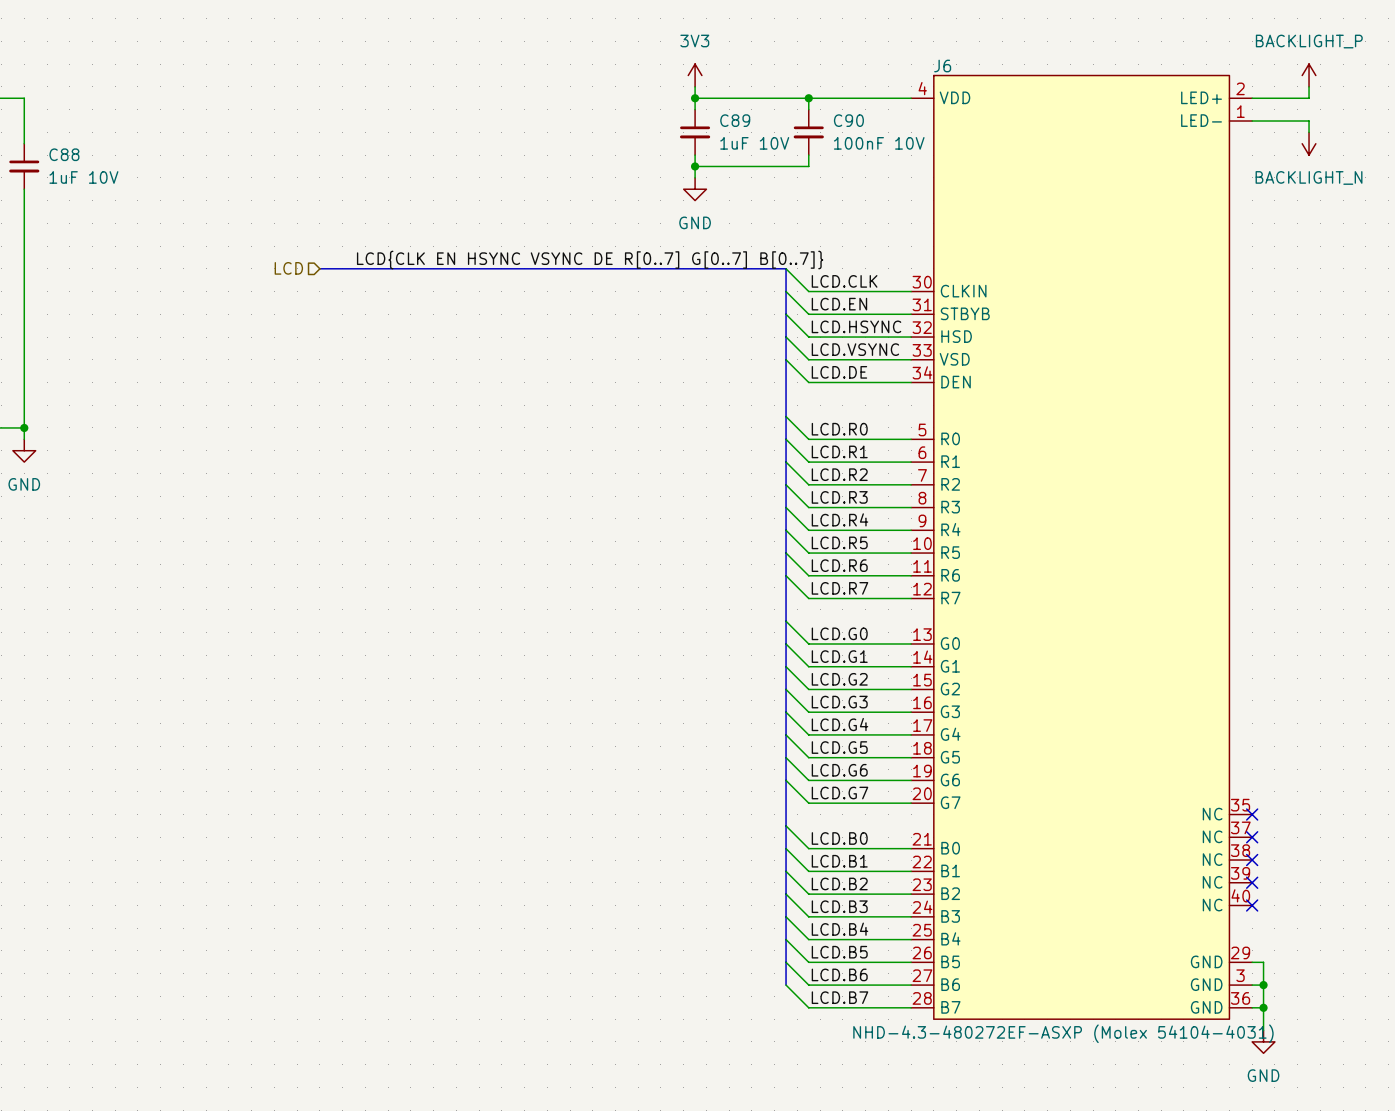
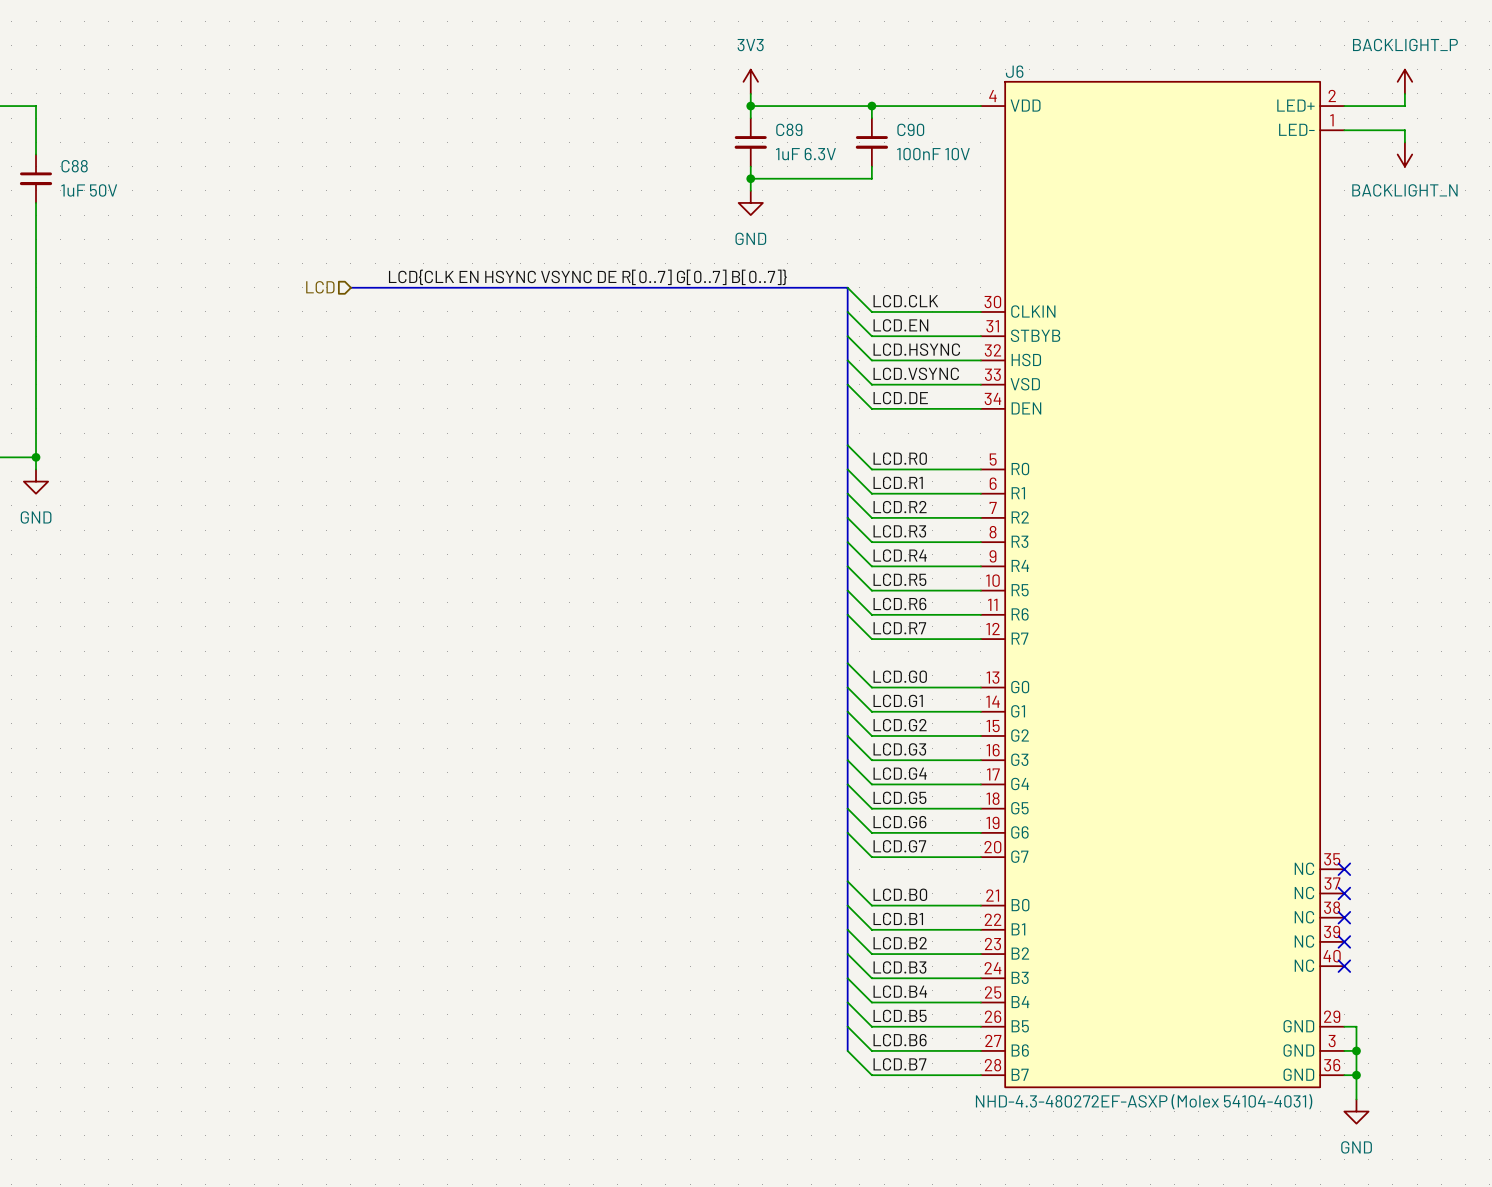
C89 value: 1uF 10V (754, 143) -> 1uF 6.3V (805, 154)
C88 value: 1uF 10V (83, 177) -> 1uF 50V (89, 190)

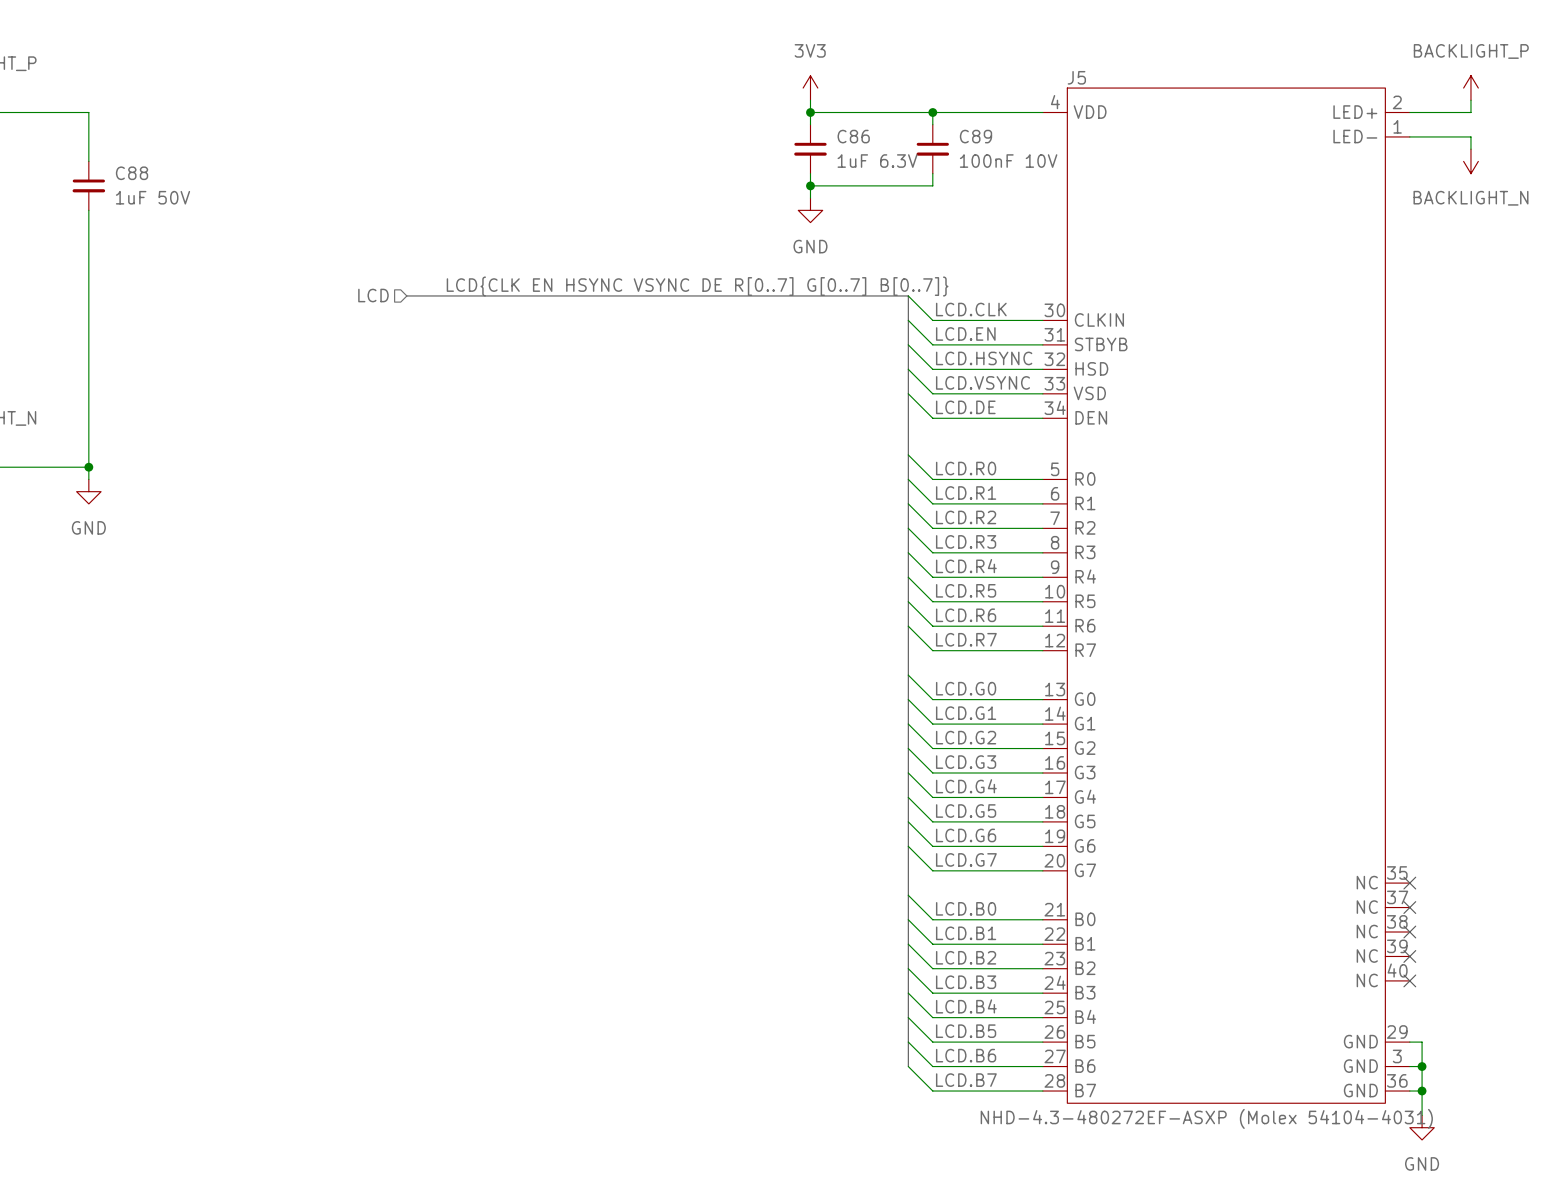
J6 name: J6 (1014, 71) -> J5 (1076, 77)
C89 name: C89 (789, 129) -> C86 (853, 136)
C90 name: C90 (910, 129) -> C89 (975, 136)

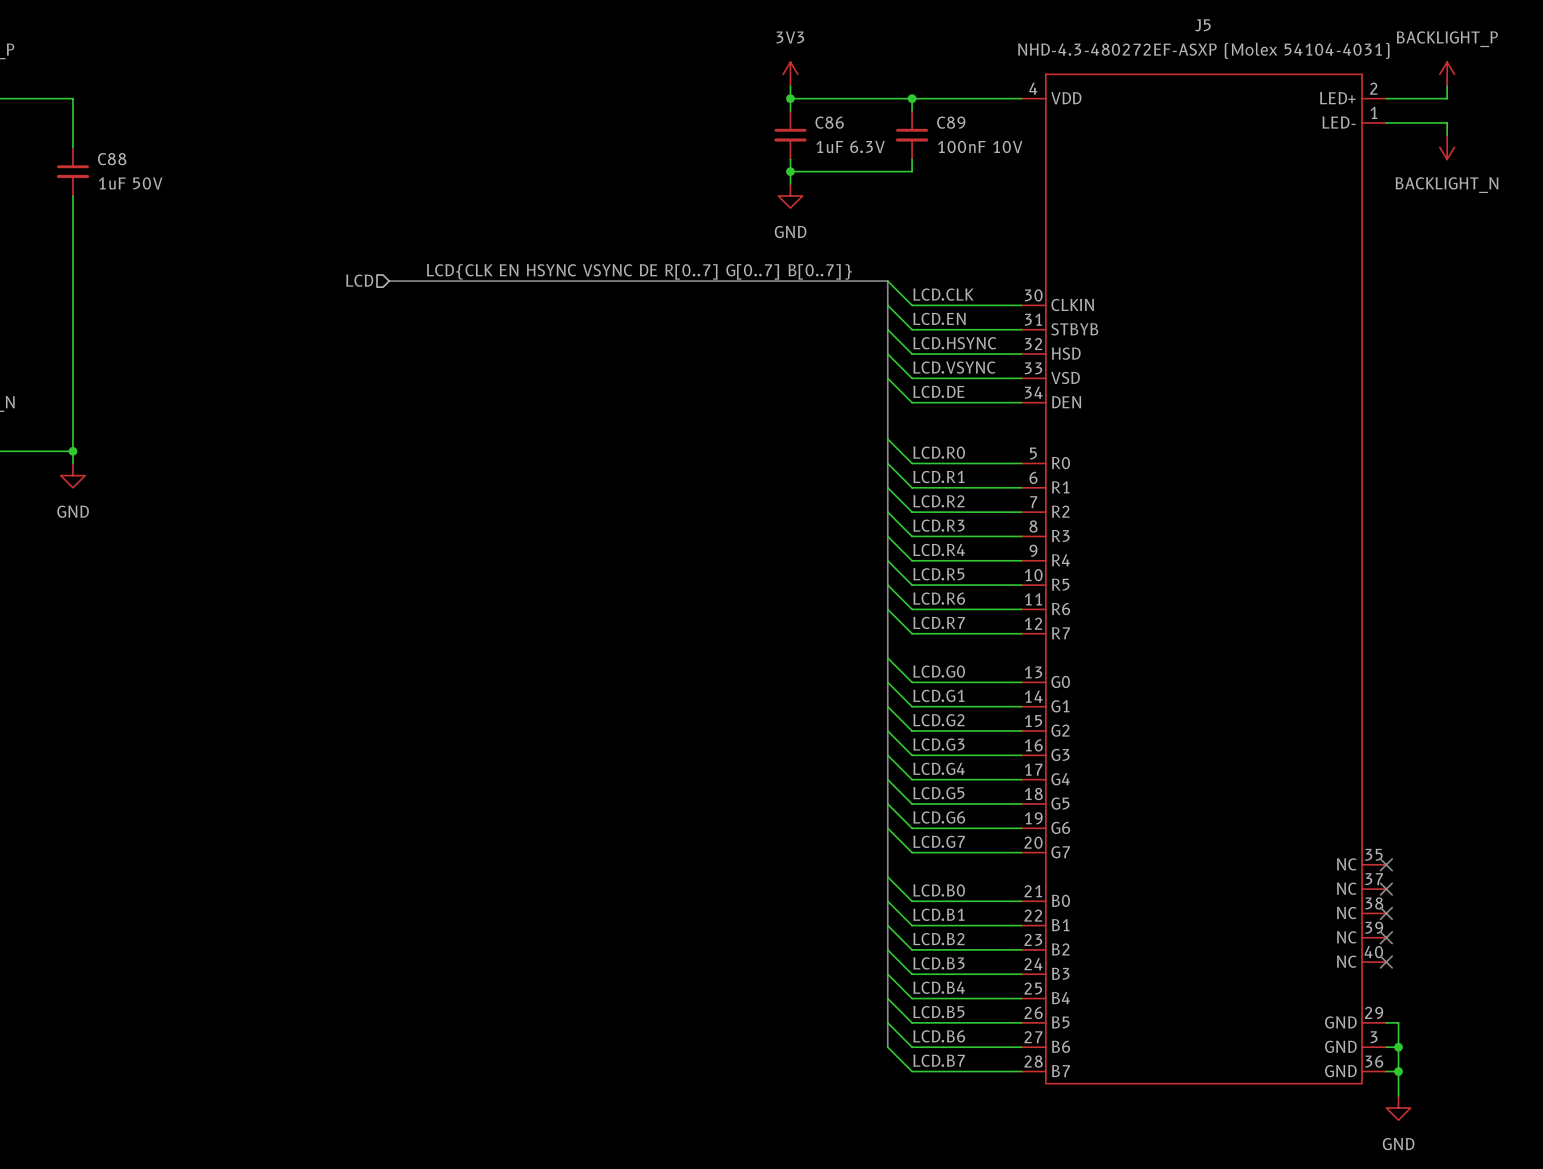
J5 name position: J5 (1076, 77) -> J5 (1202, 25)
J5 value position: NHD-4.3-480272EF-ASXP (Molex 54104-4031) (1206, 1118) -> NHD-4.3-480272EF-ASXP (Molex 54104-4031) (1203, 50)

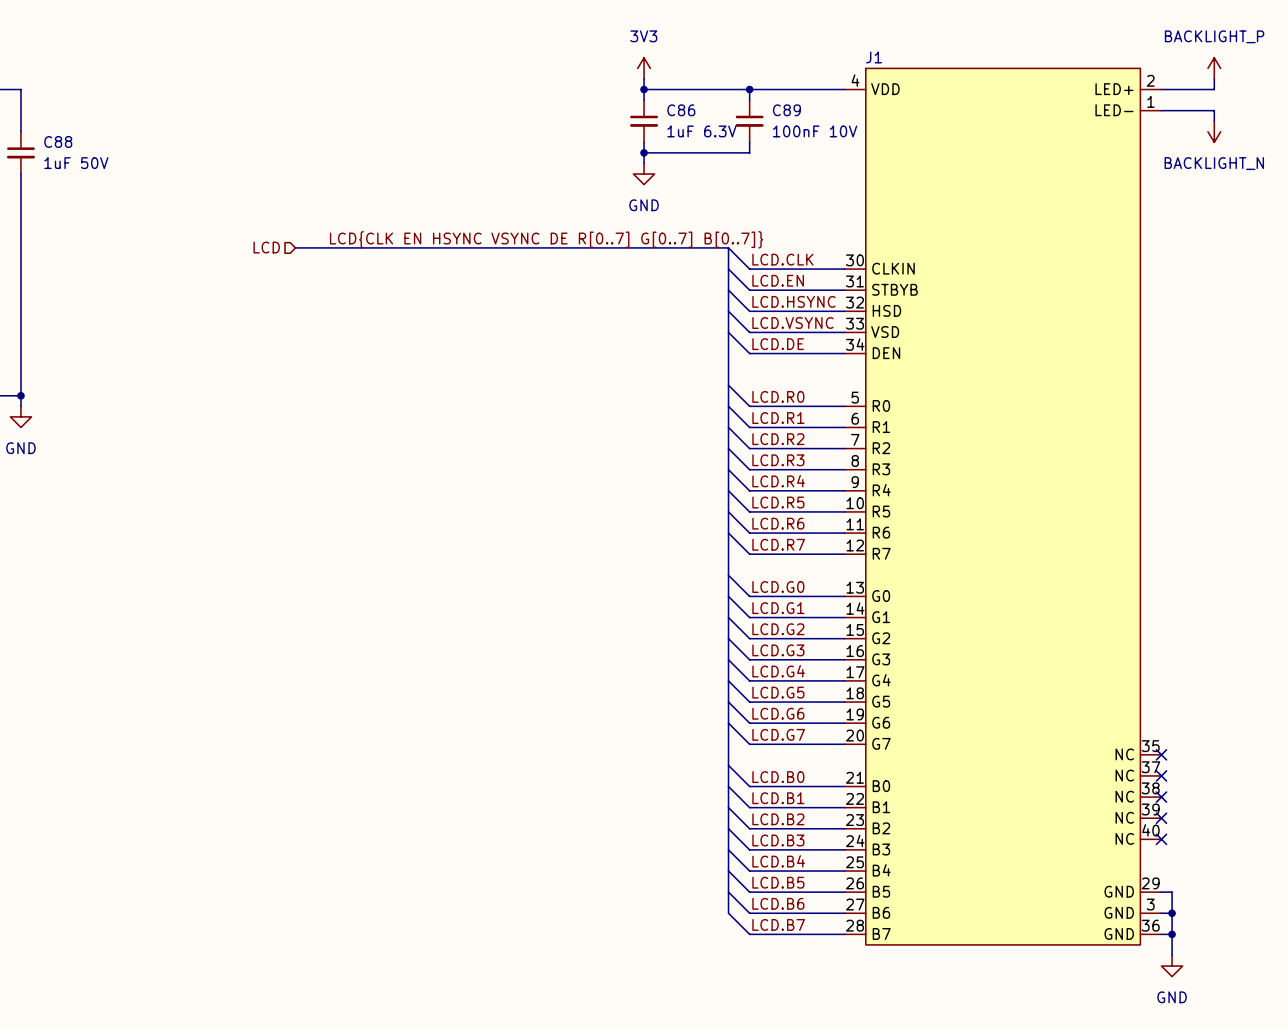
J5 name: J5 (1202, 25) -> J1 (874, 57)
J5 value: NHD-4.3-480272EF-ASXP (Molex 54104-4031) (1203, 50) -> none

